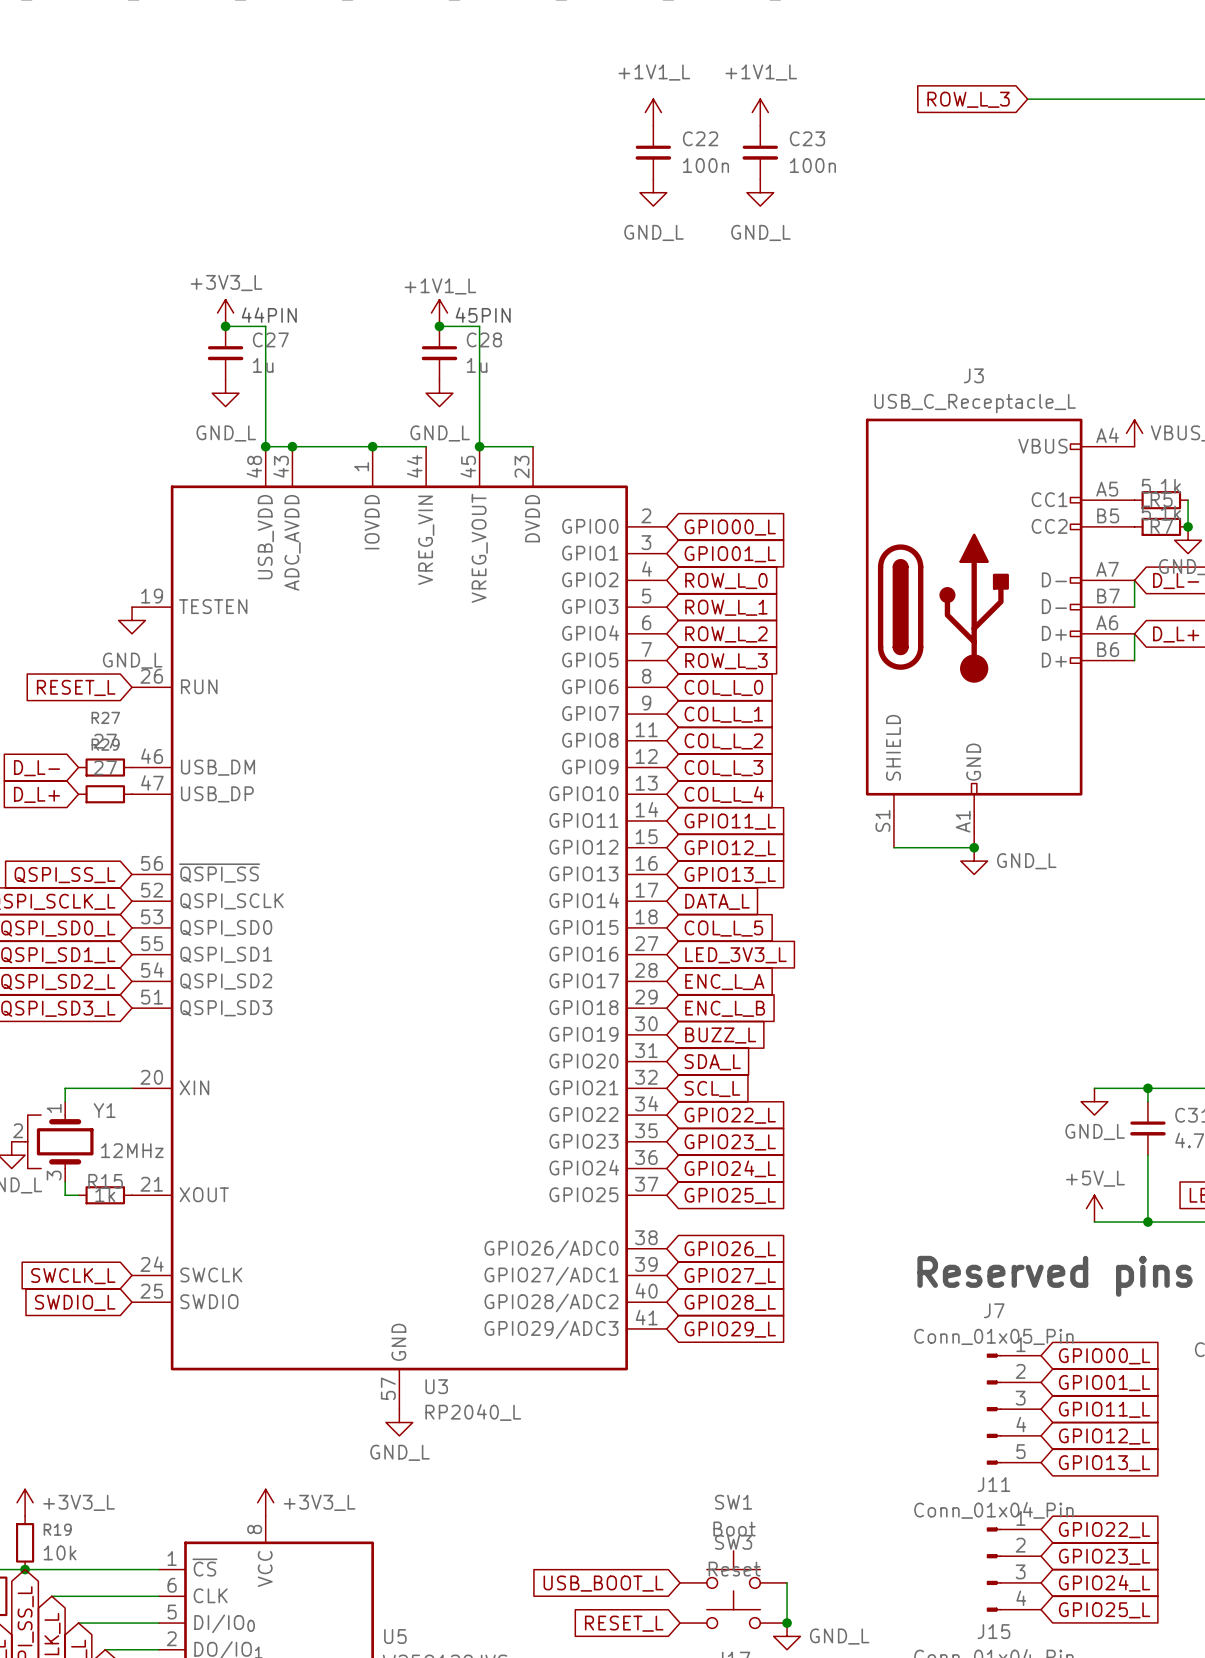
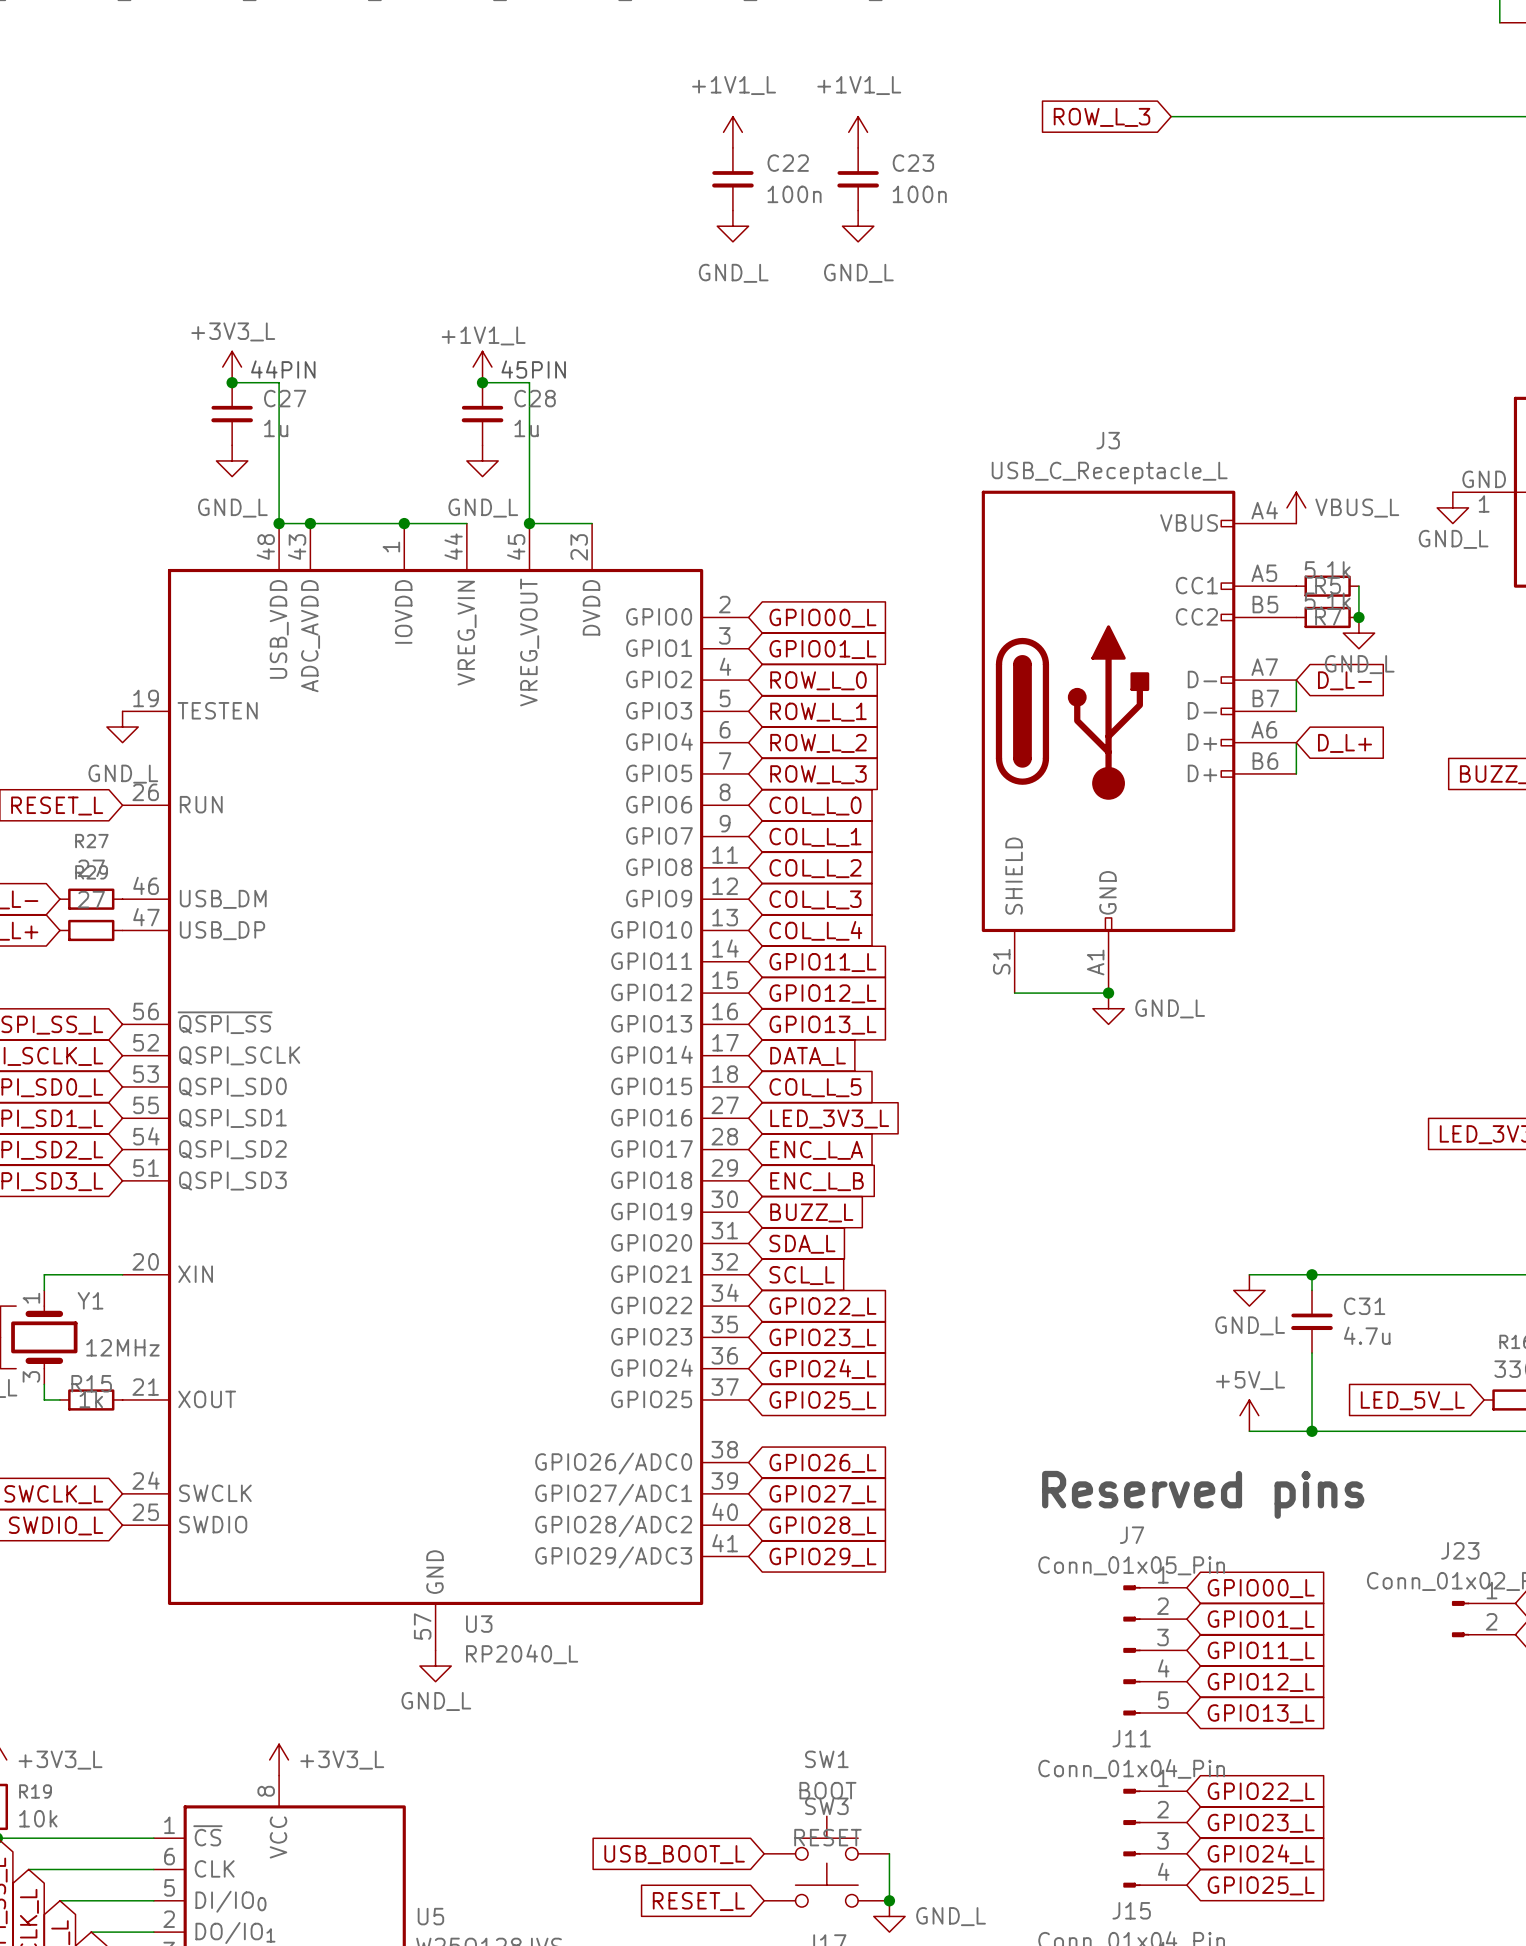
SW1 value: Boot (734, 1528) -> BOOT (827, 1790)
SW3 value: Reset (734, 1569) -> RESET (827, 1837)

